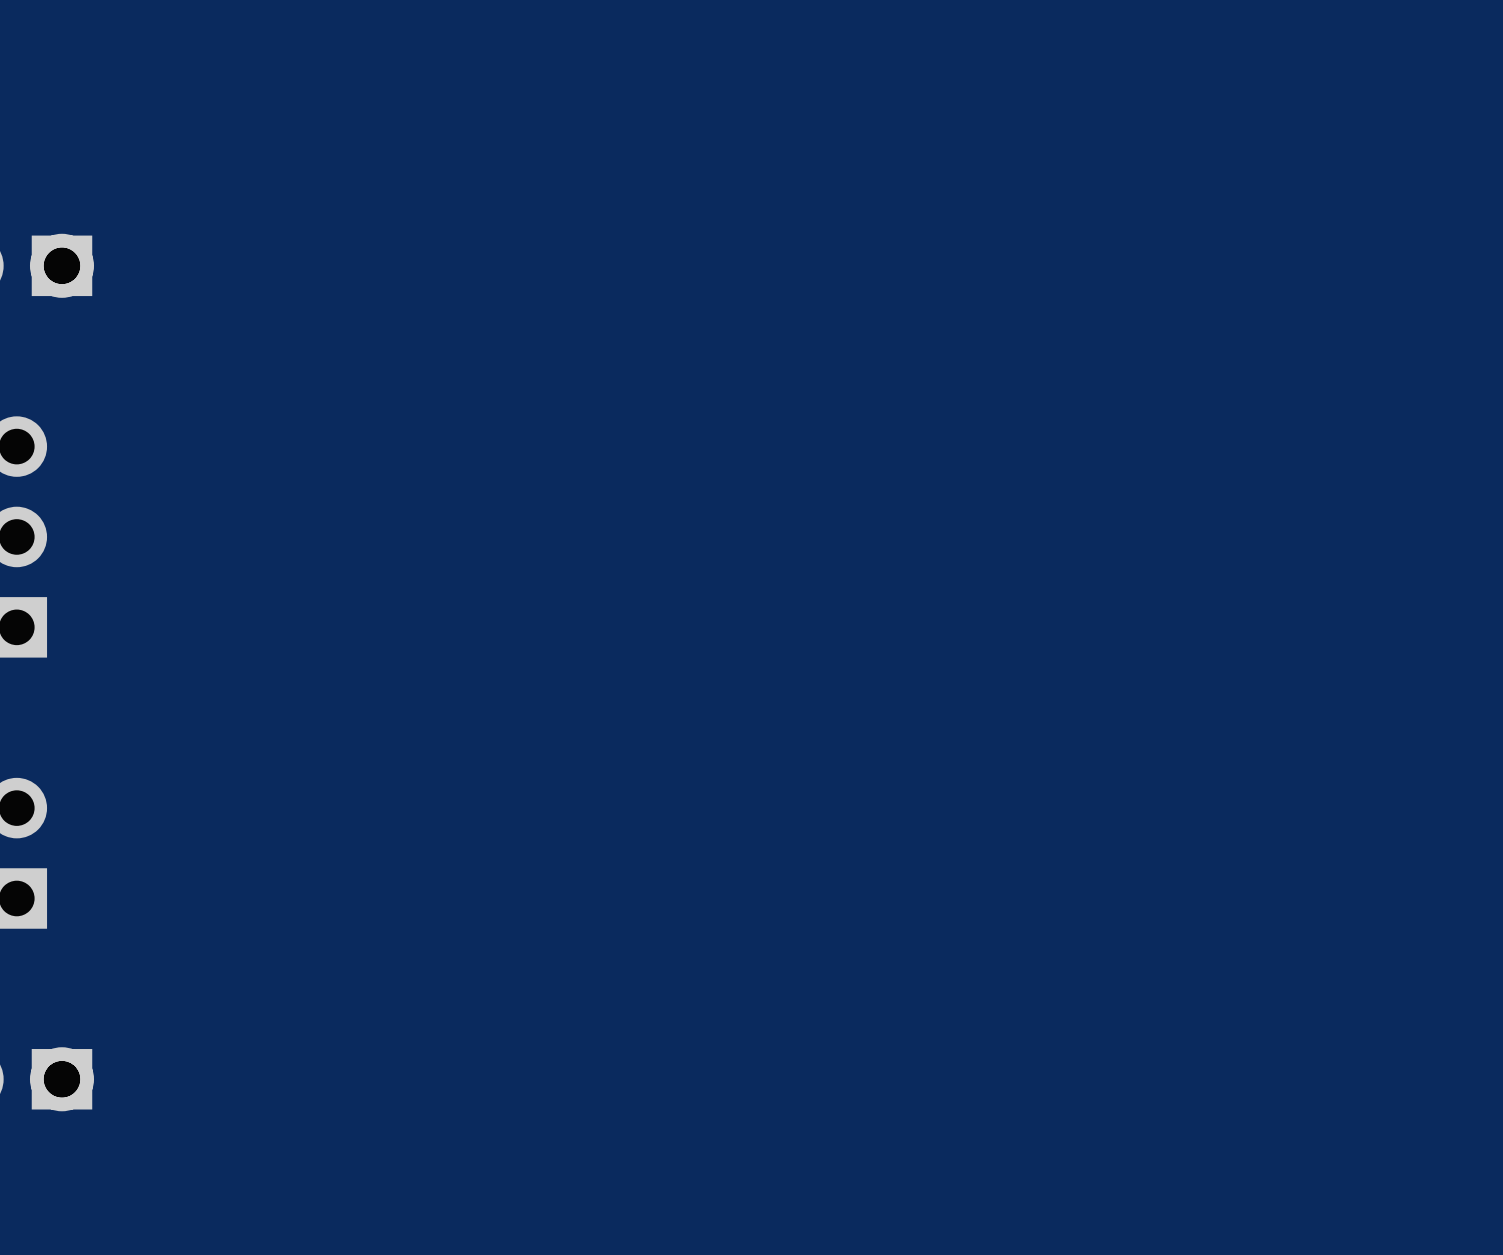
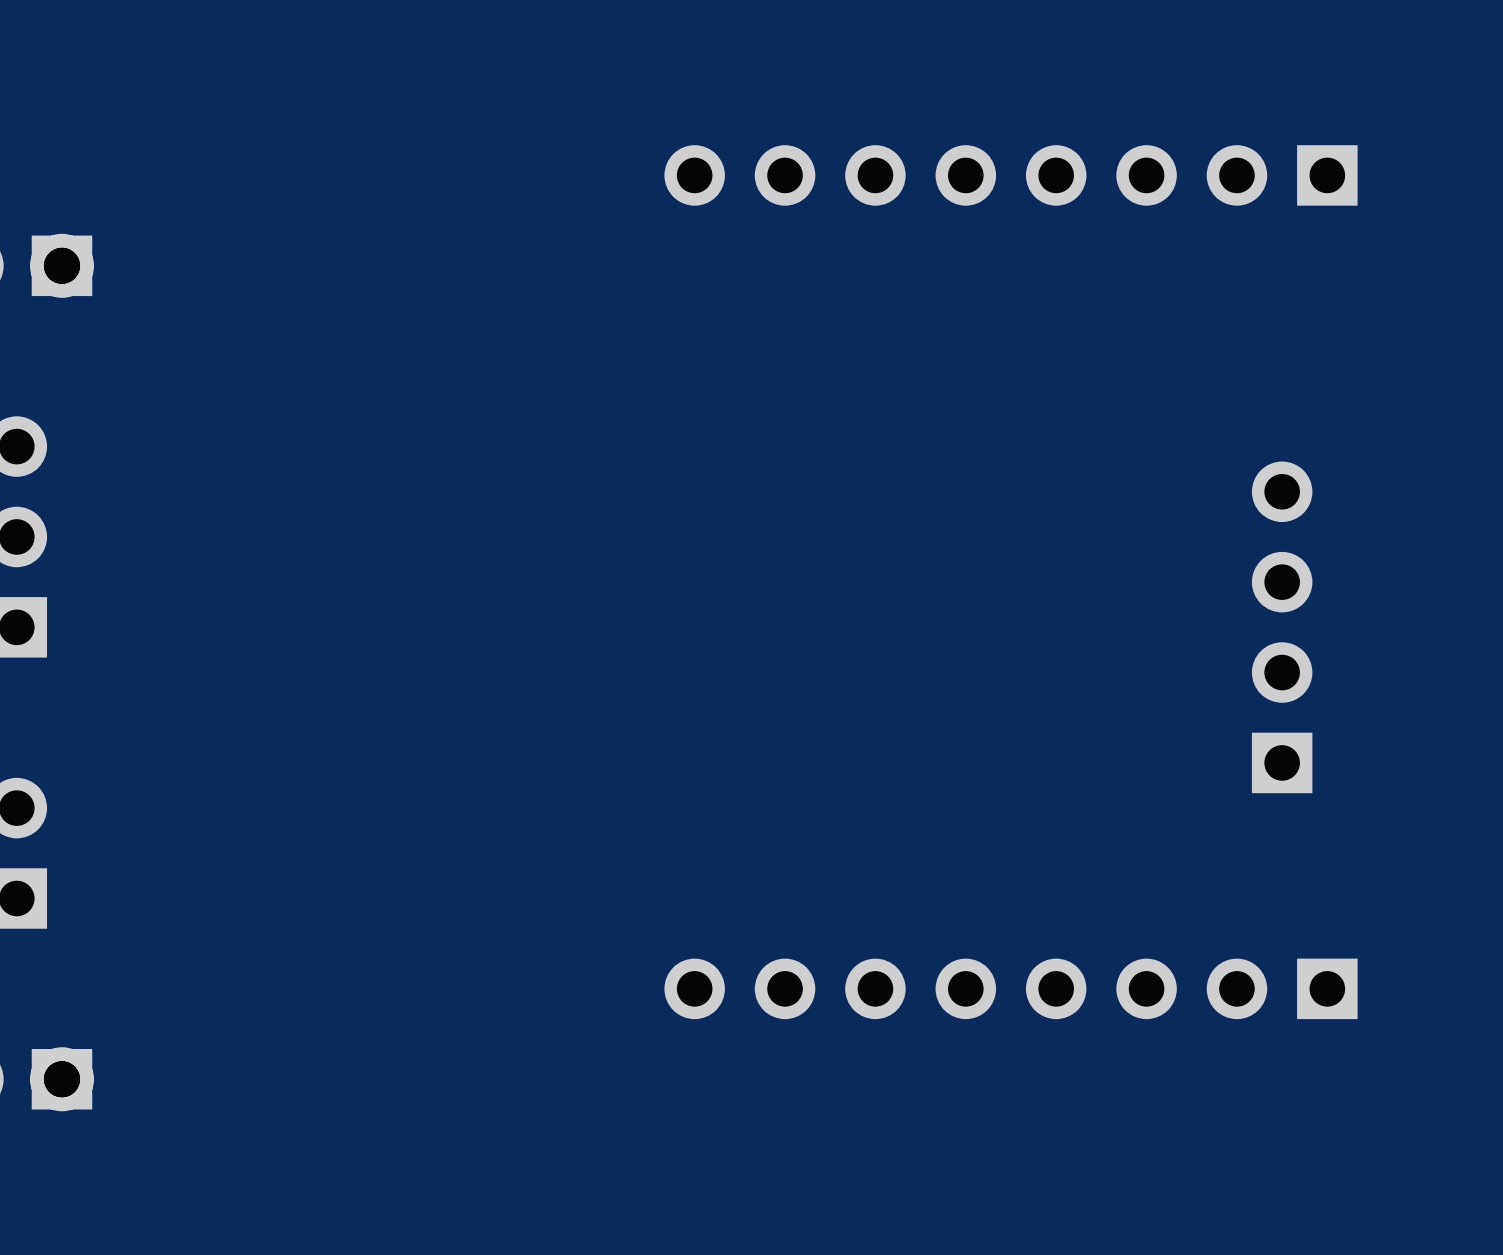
part: none -> (1011, 175)
part: none -> (1282, 627)
part: none -> (1011, 988)

